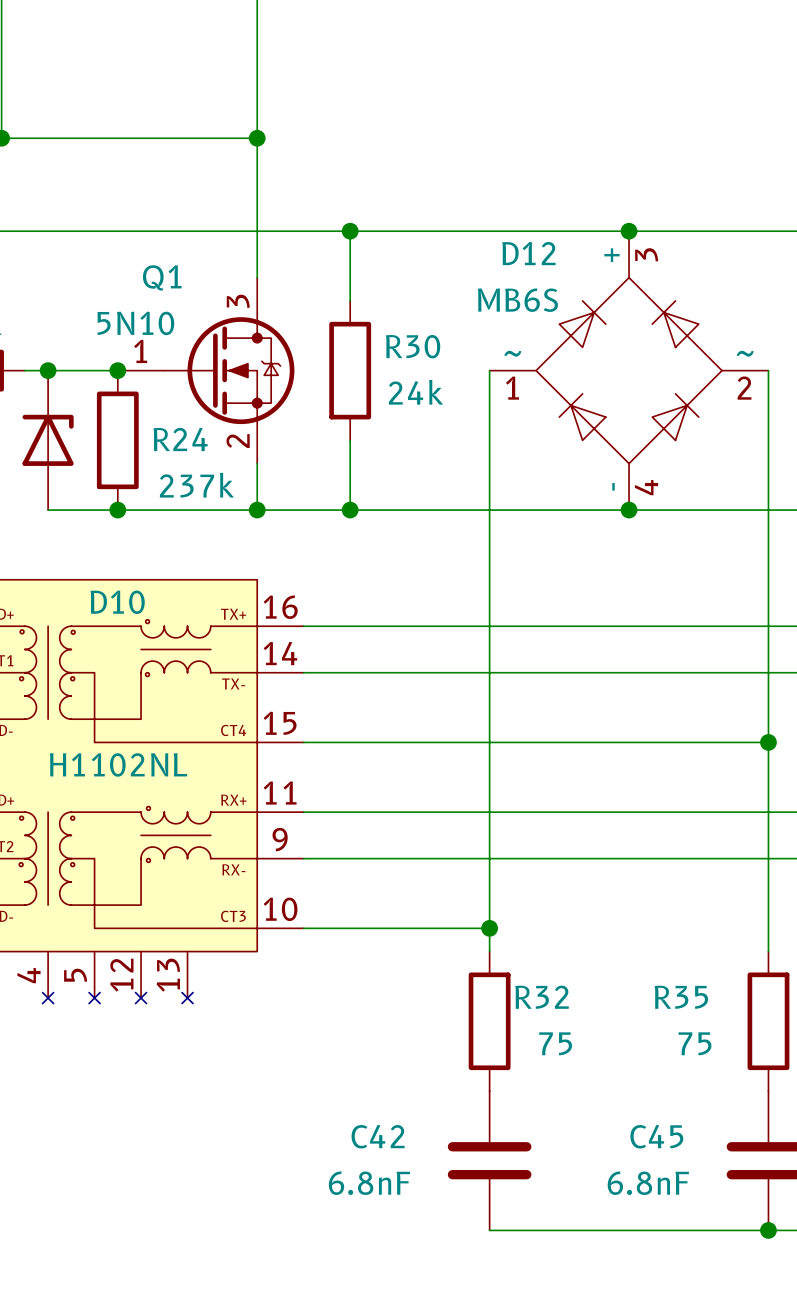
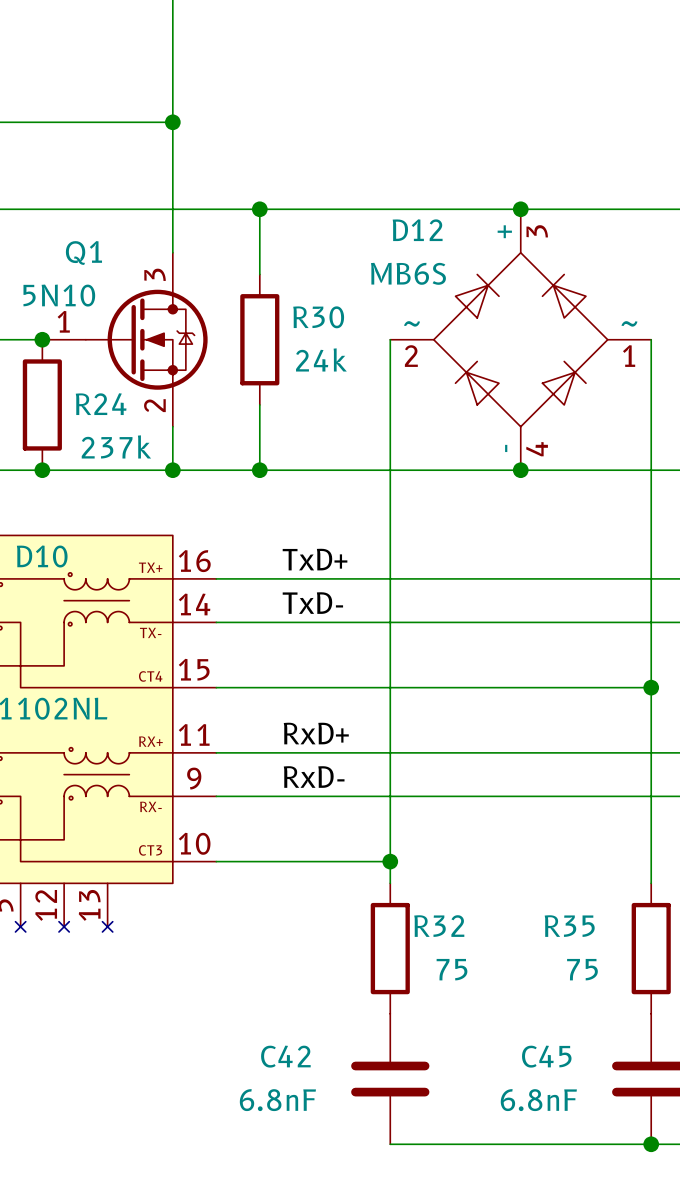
D12 flip: as is (629, 370) -> left-right (520, 339)
label: none -> TxD+ (315, 559)
label: none -> TxD- (312, 603)
label: none -> RxD+ (316, 733)
label: none -> RxD- (314, 777)

